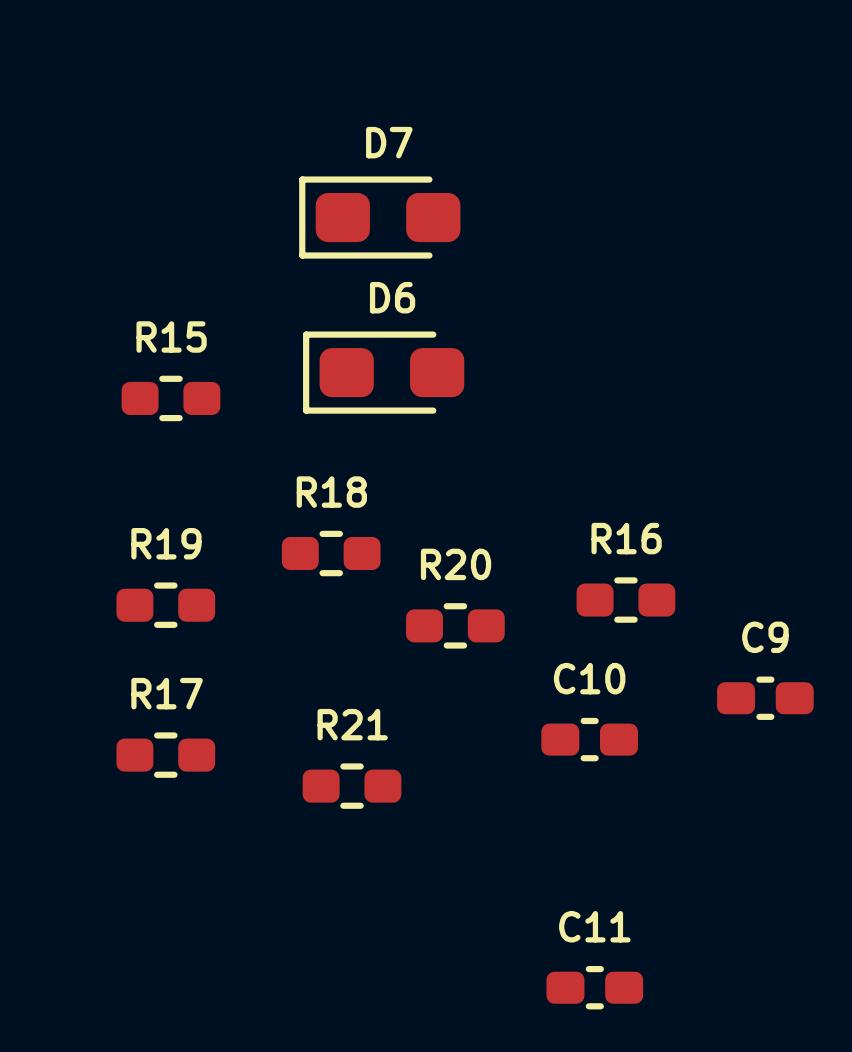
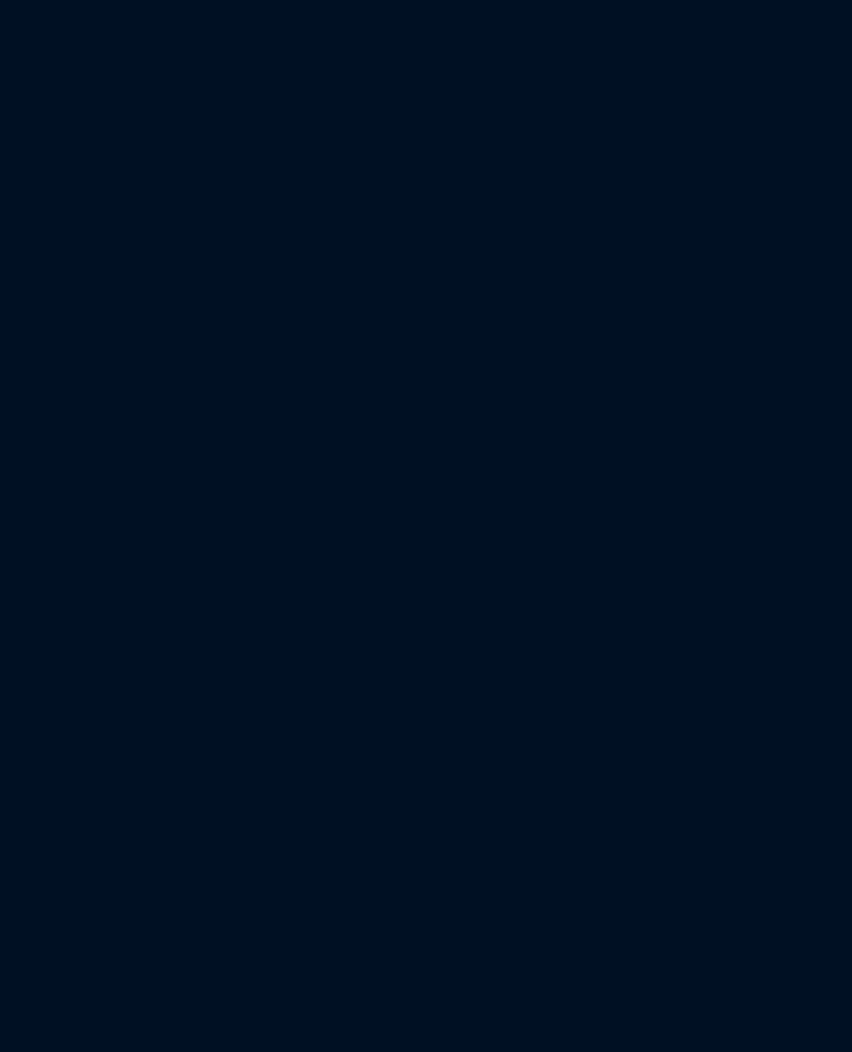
D7: (379, 217) -> none
D6: (383, 372) -> none
R15: (170, 398) -> none
R18: (331, 553) -> none
R16: (625, 600) -> none
R19: (165, 605) -> none
R20: (455, 625) -> none
C9: (765, 698) -> none
C10: (589, 739) -> none
R17: (165, 755) -> none
R21: (352, 786) -> none
C11: (594, 987) -> none

